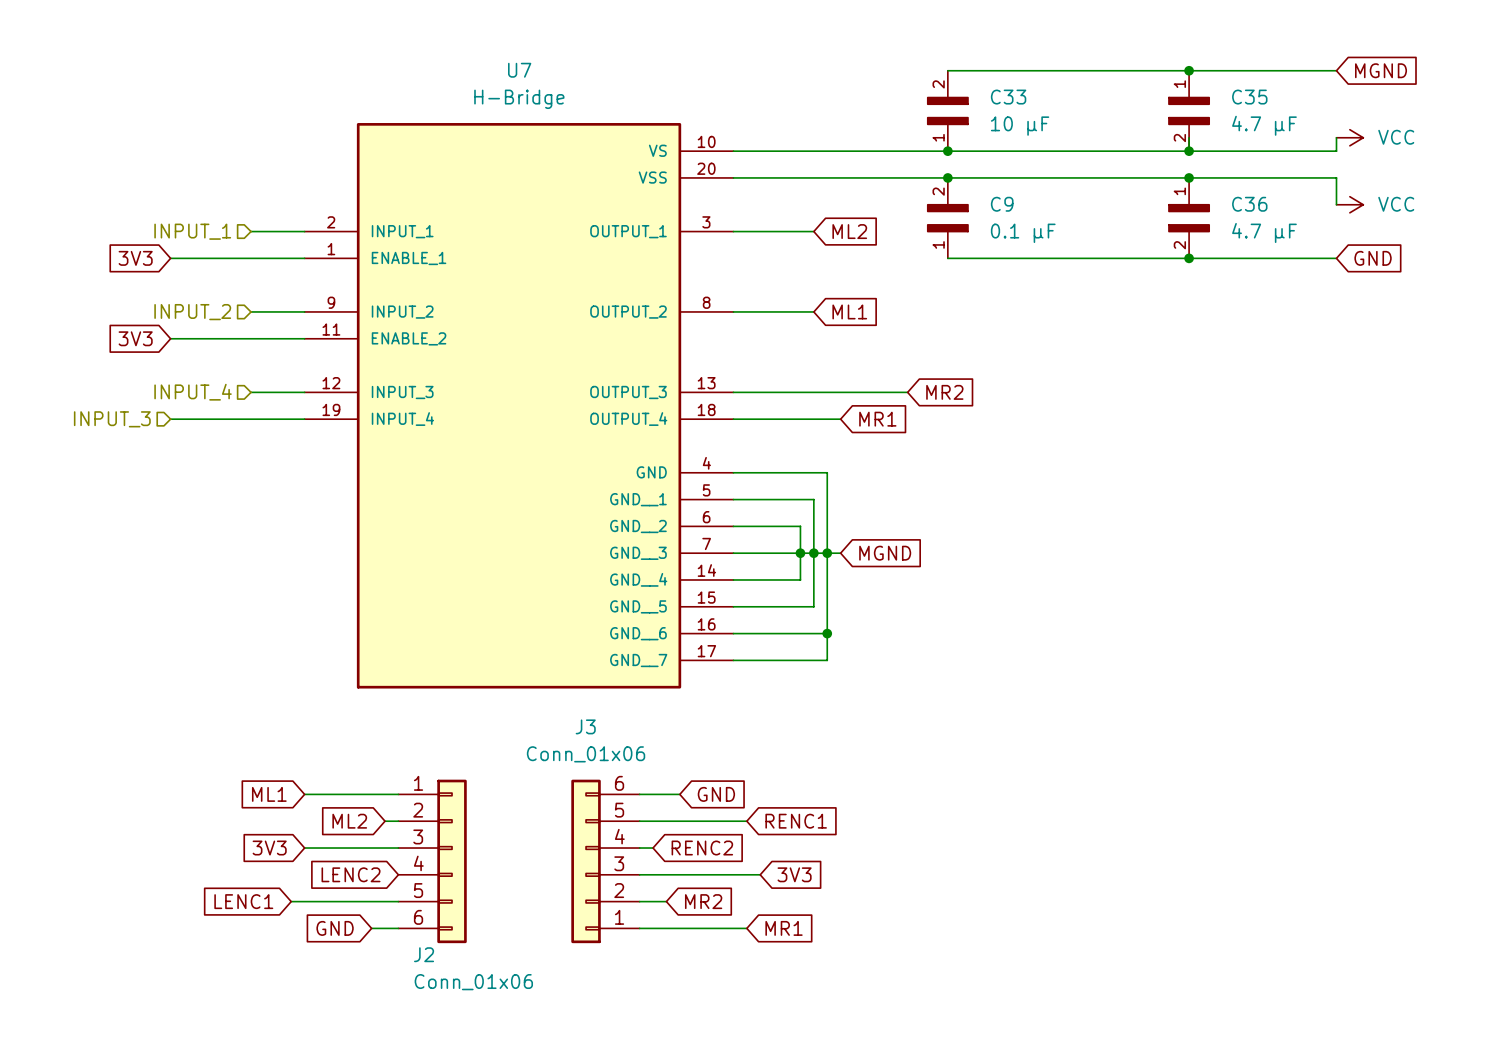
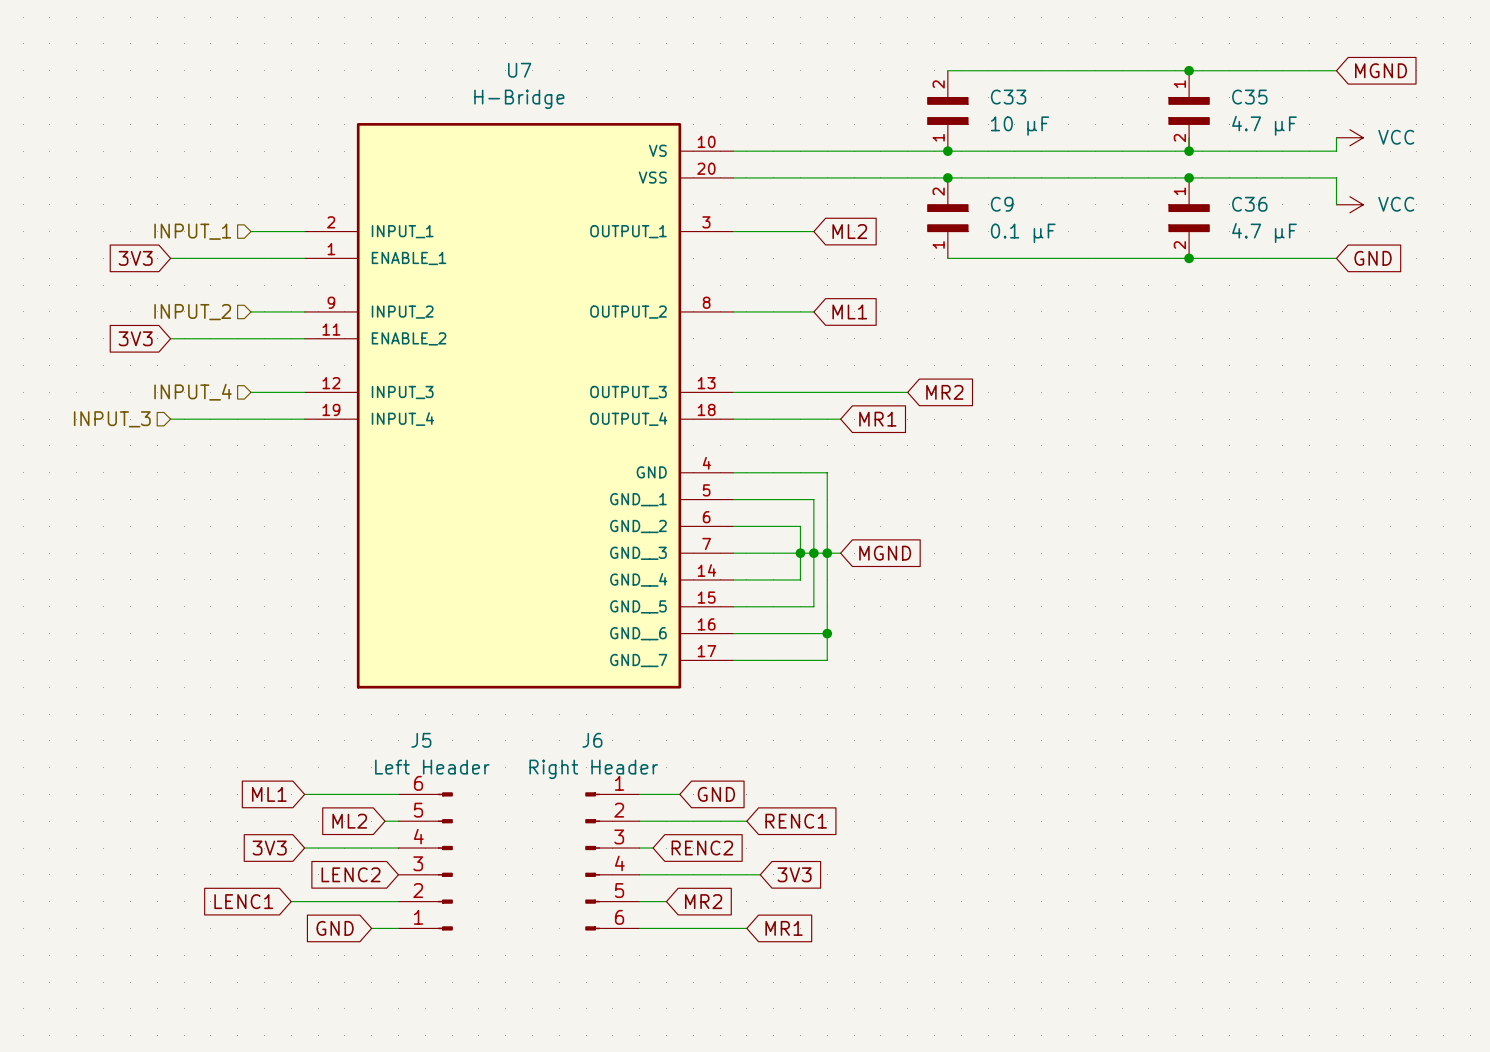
J5: none -> Left Header (425, 861)
J2: Conn_01x06 (432, 861) -> none
J3: Conn_01x06 (605, 861) -> none
J6: none -> Right Header (612, 861)

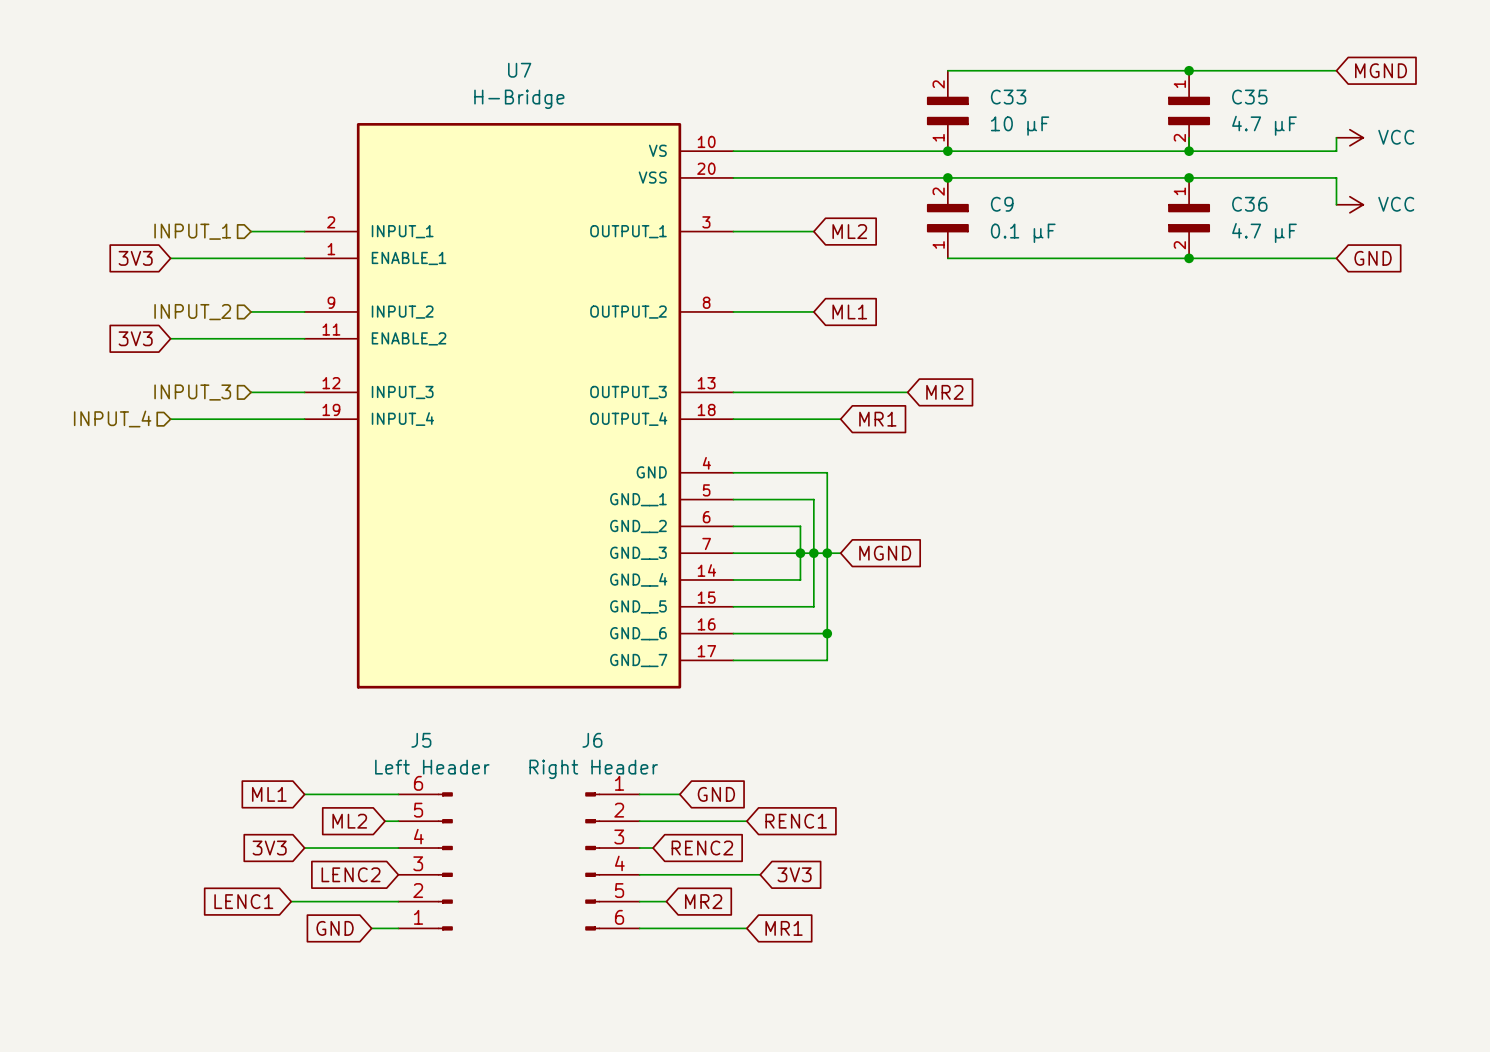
hierarchical label: INPUT_4 (193, 392) -> INPUT_3 (192, 392)
hierarchical label: INPUT_3 (112, 419) -> INPUT_4 (112, 418)

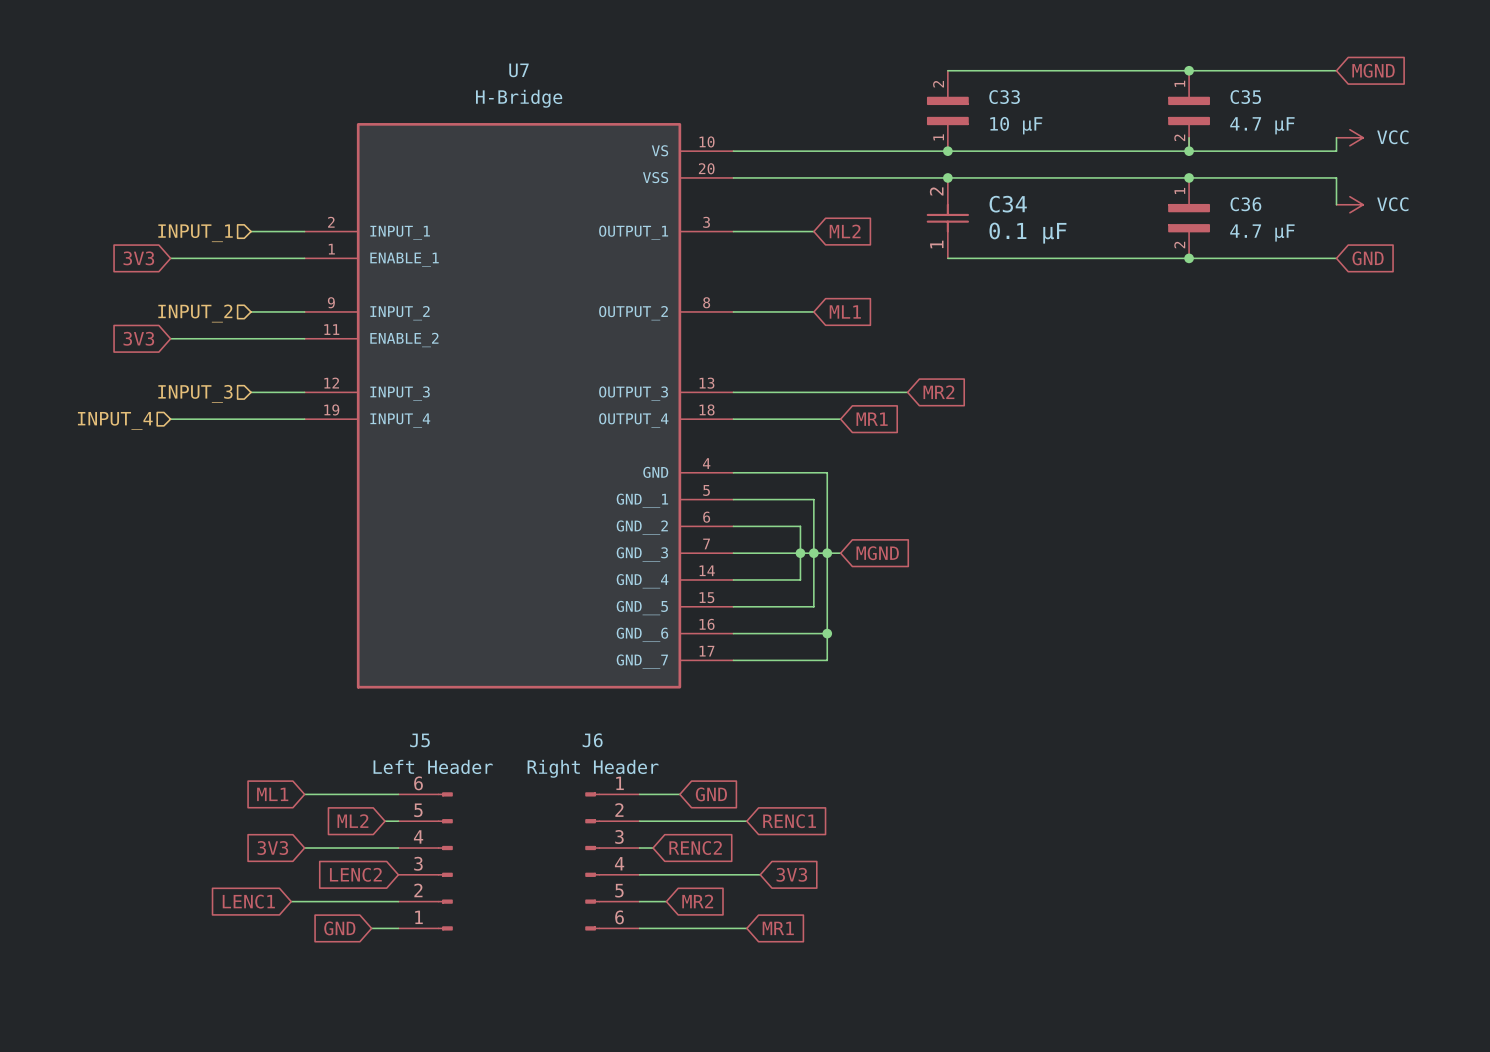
C9: 0.1 µF (947, 218) -> none
C34: none -> 0.1 µF (947, 218)

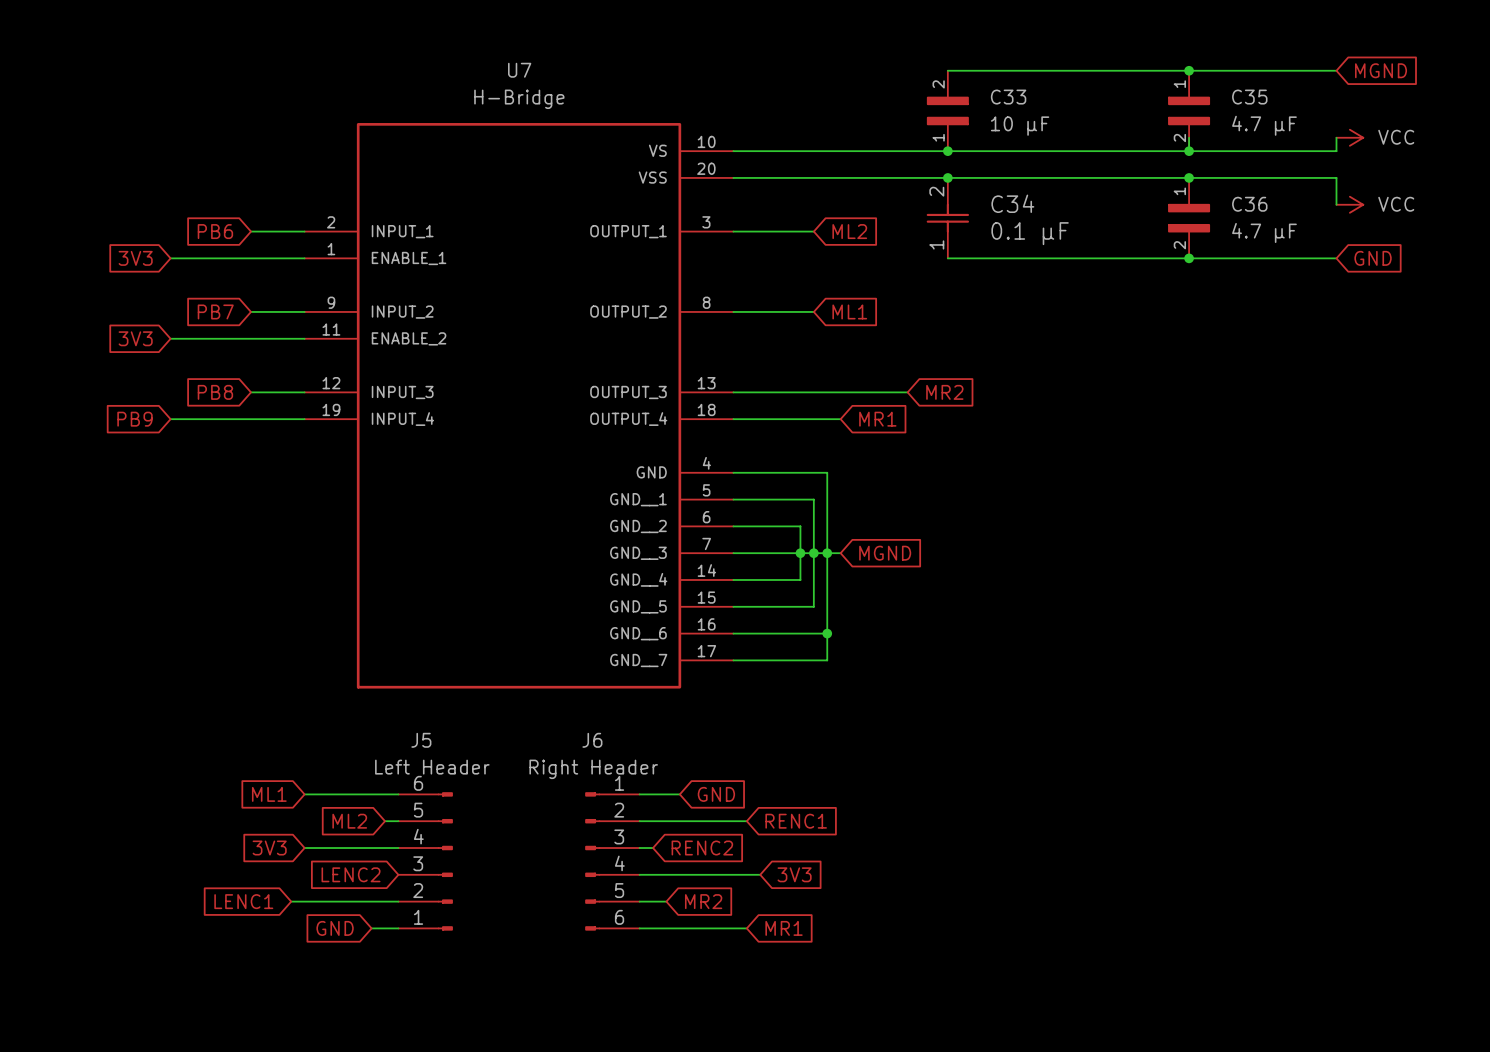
global label: none -> PB6 (215, 231)
hierarchical label: INPUT_1 (195, 233) -> none
global label: none -> PB7 (215, 311)
hierarchical label: INPUT_2 (195, 313) -> none
global label: none -> PB8 (215, 392)
hierarchical label: INPUT_3 (195, 393) -> none
global label: none -> PB9 (135, 419)
hierarchical label: INPUT_4 (115, 420) -> none

